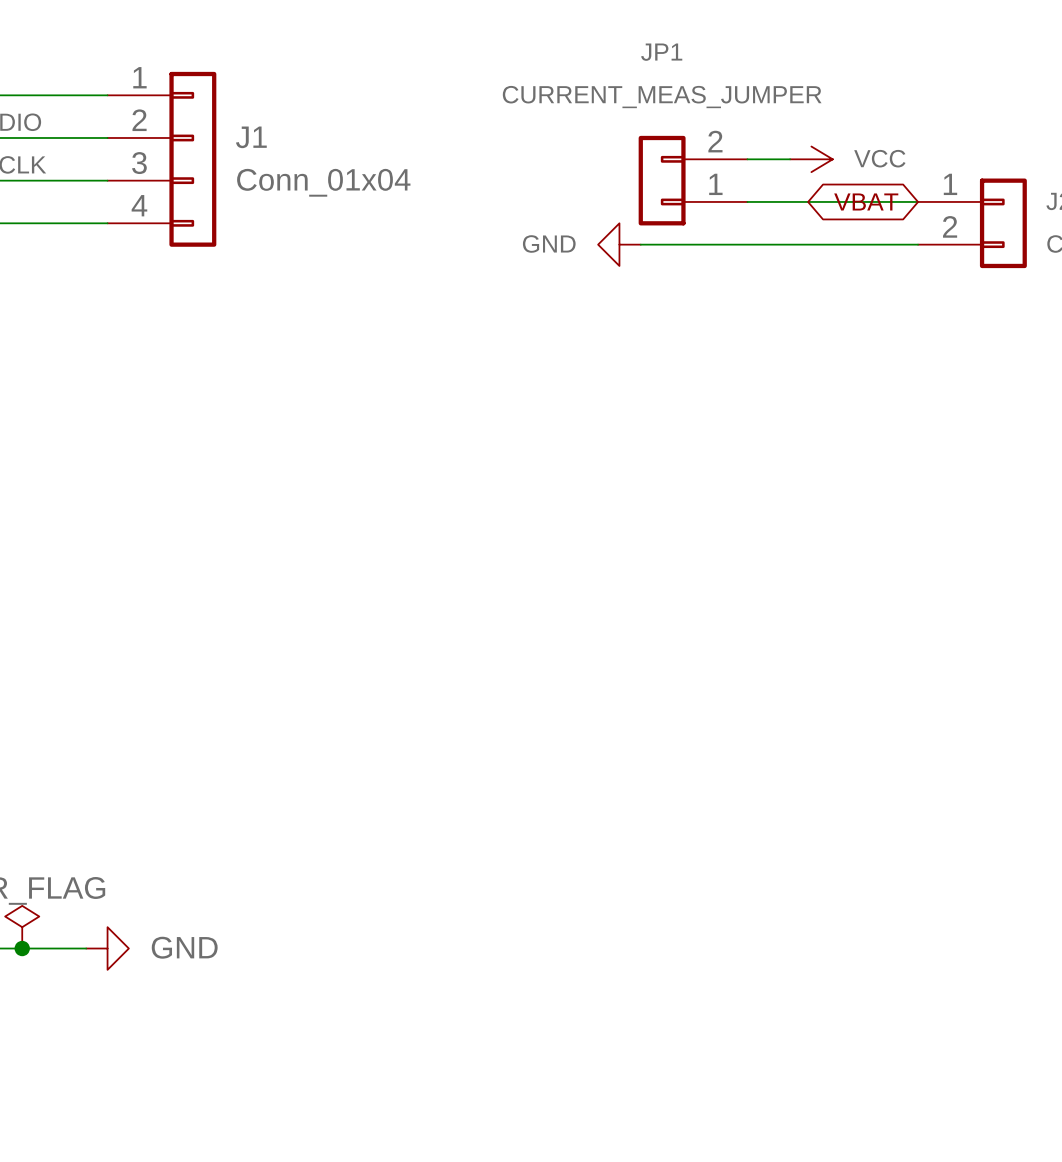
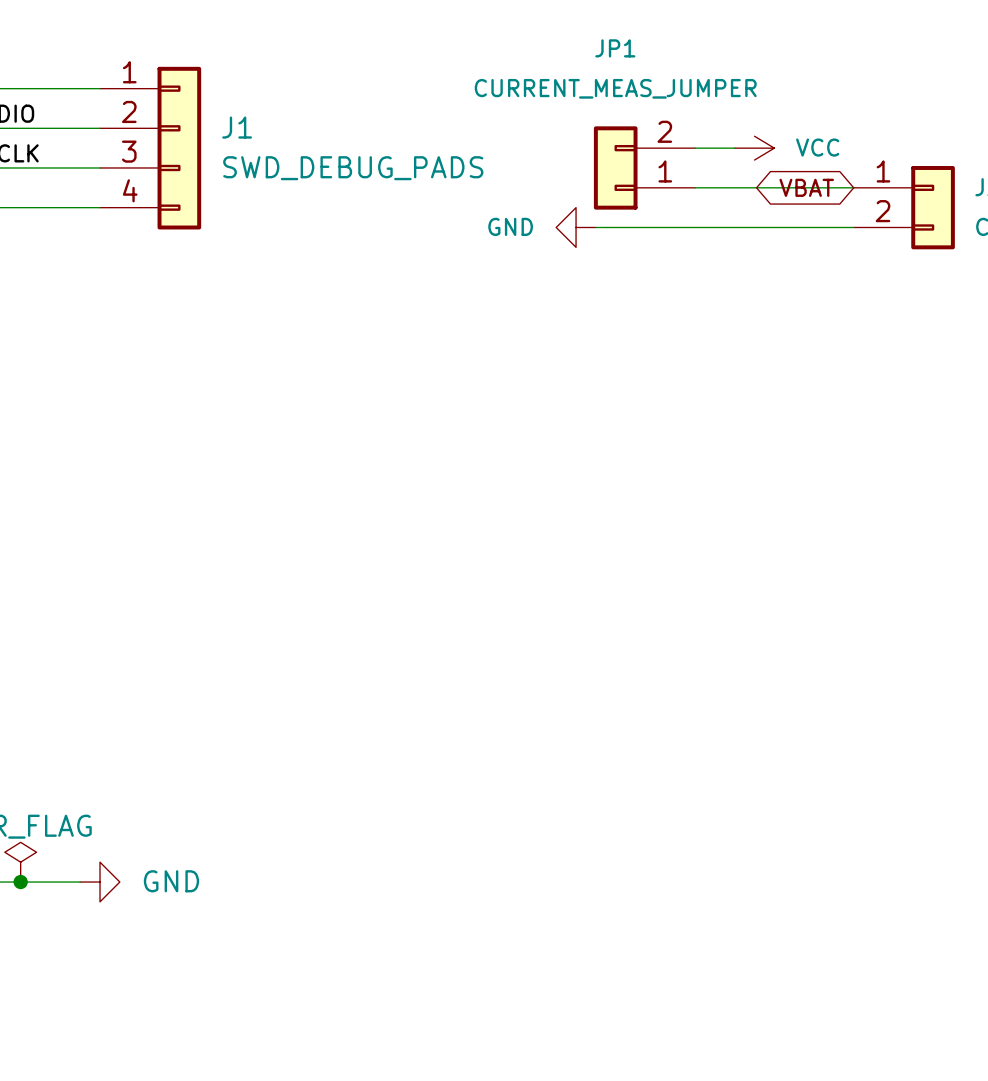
J1 value: Conn_01x04 (323, 182) -> SWD_DEBUG_PADS (353, 168)

